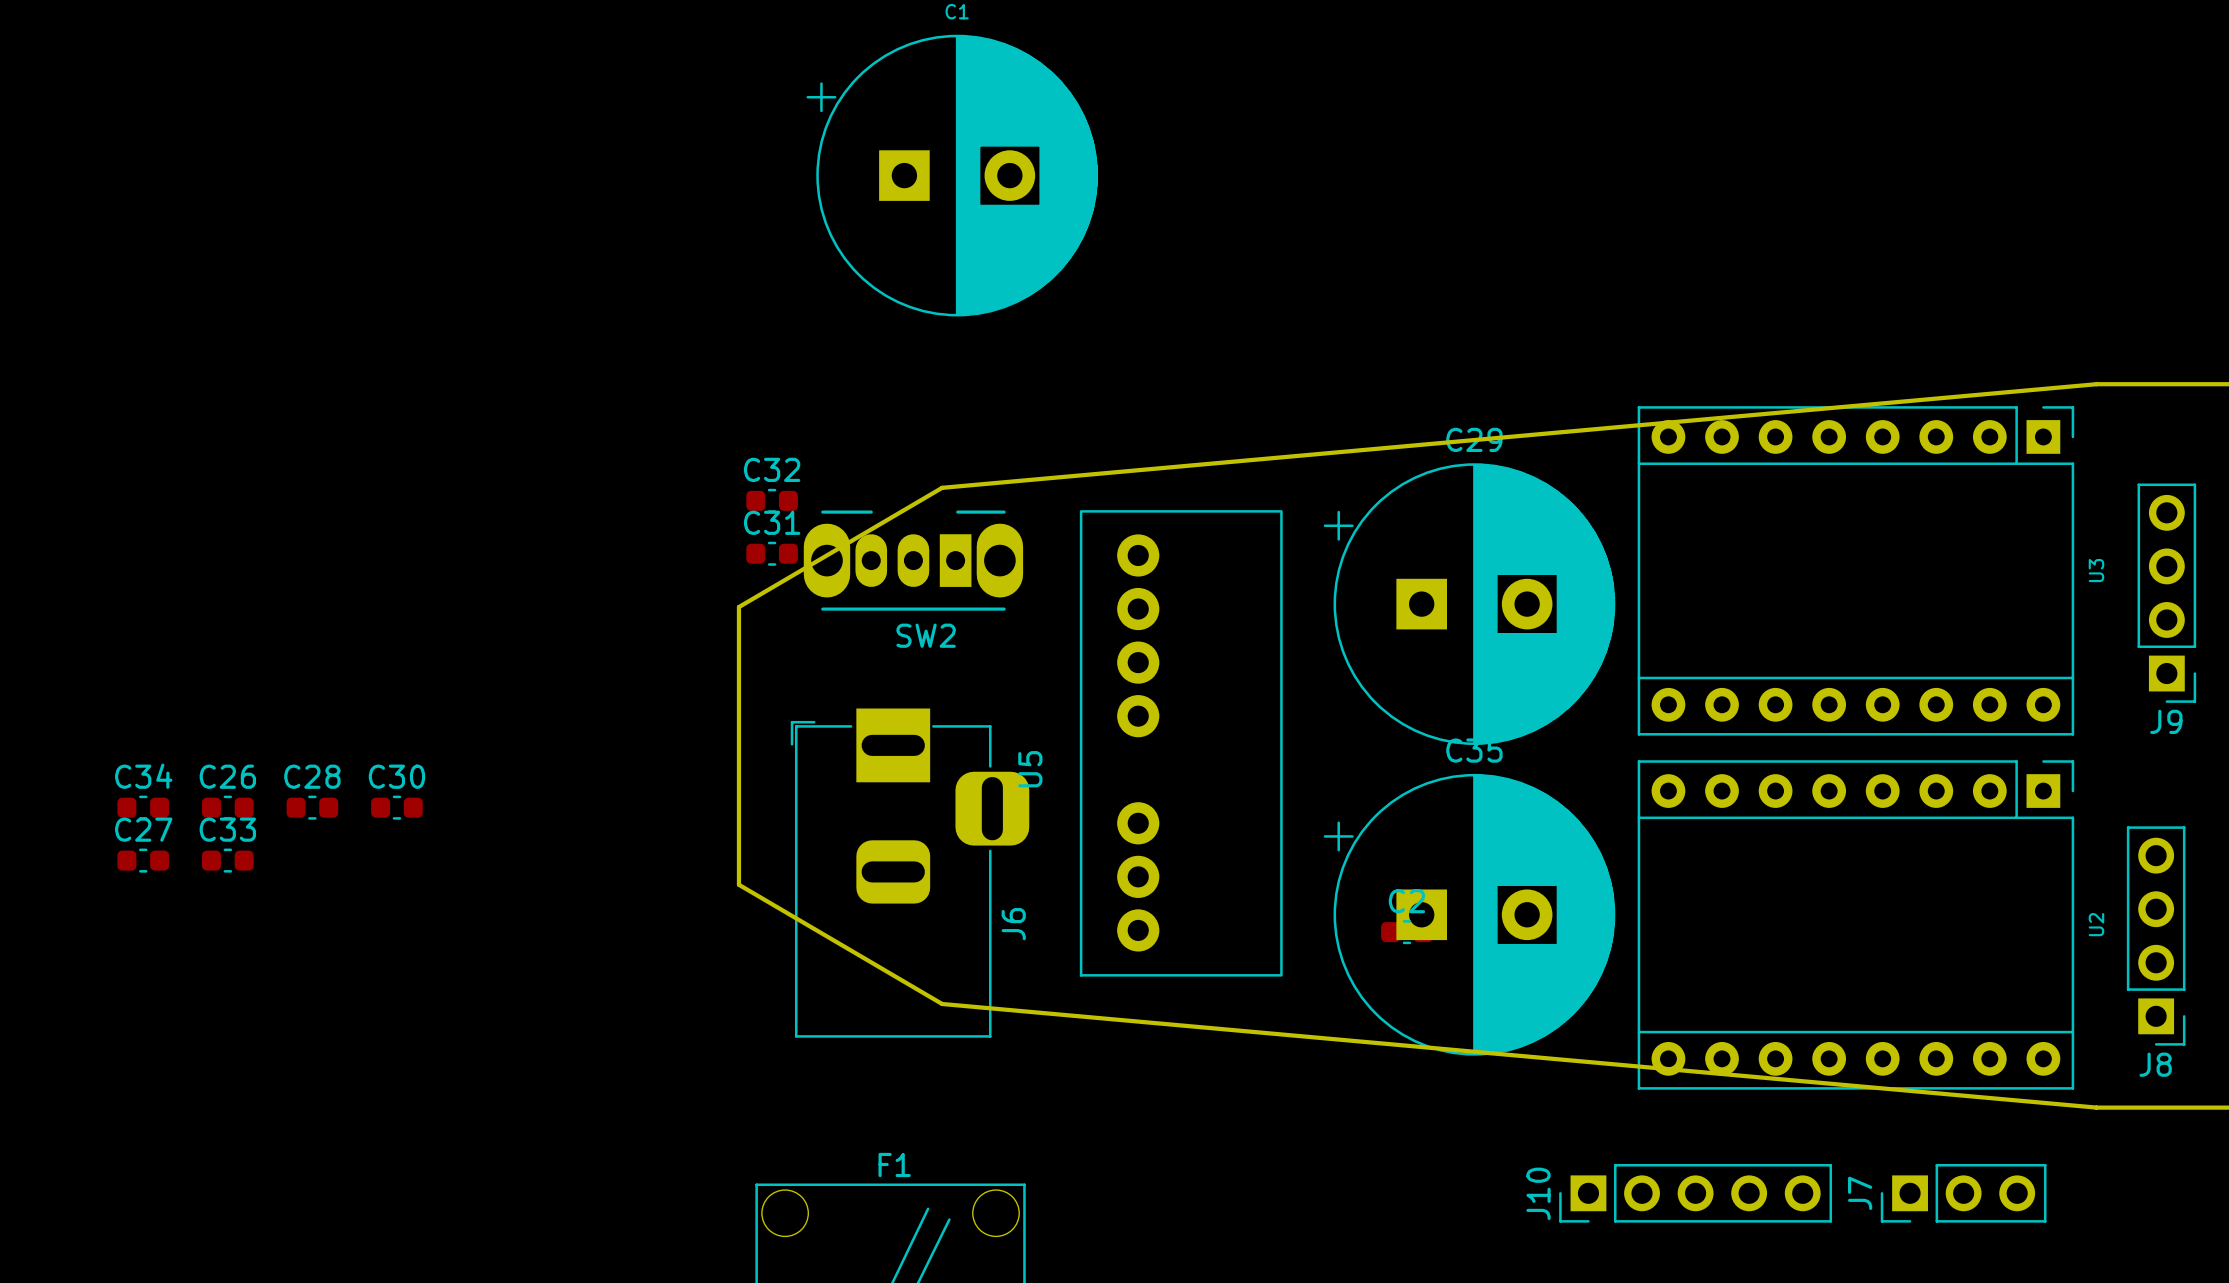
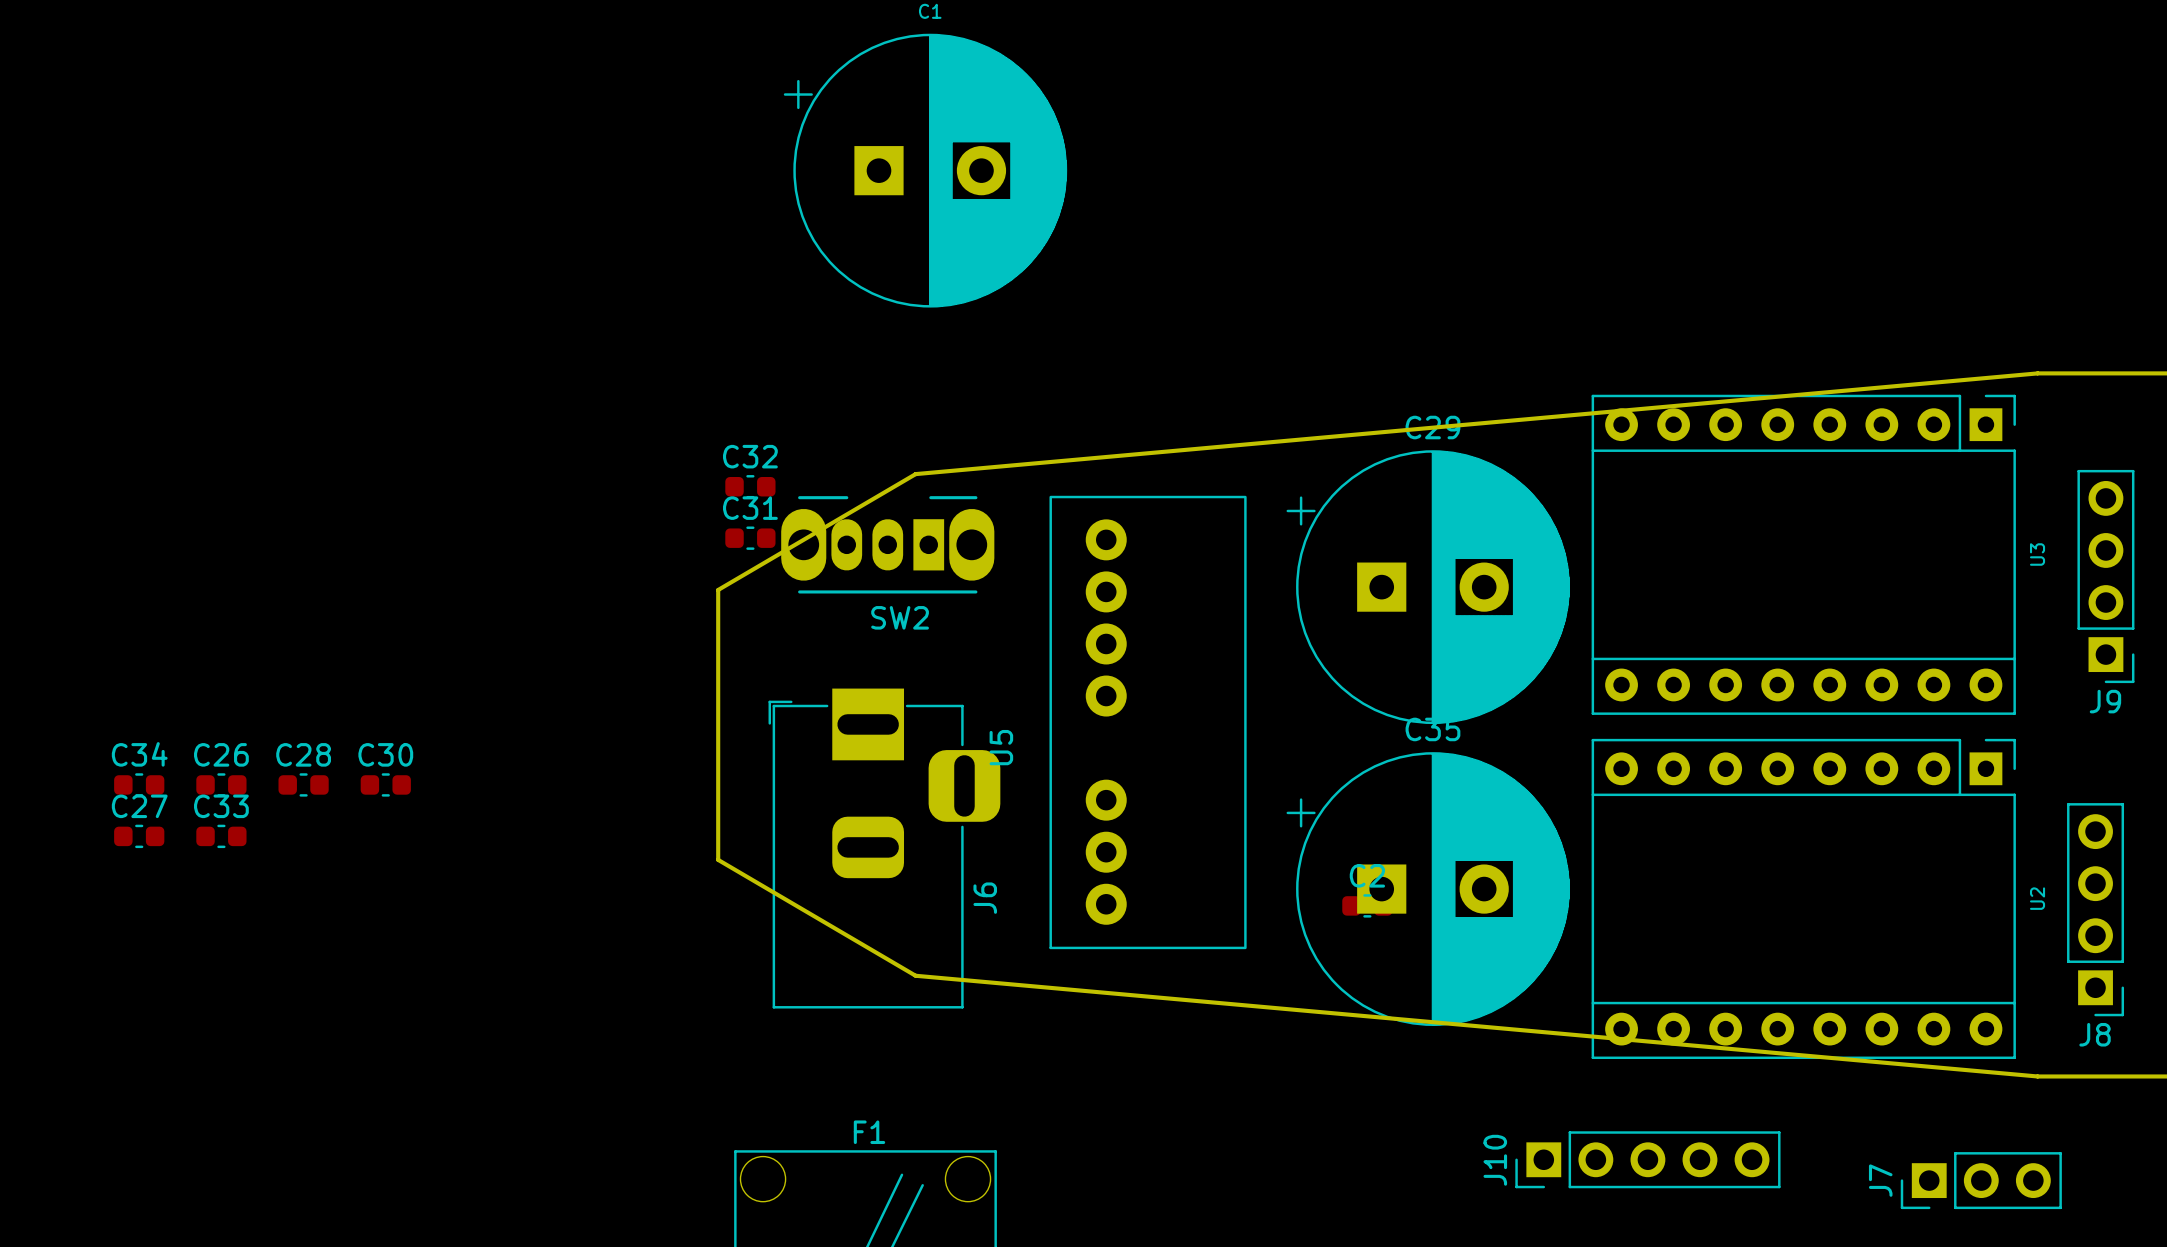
J7 position: (1963, 1193) -> (1981, 1180)

